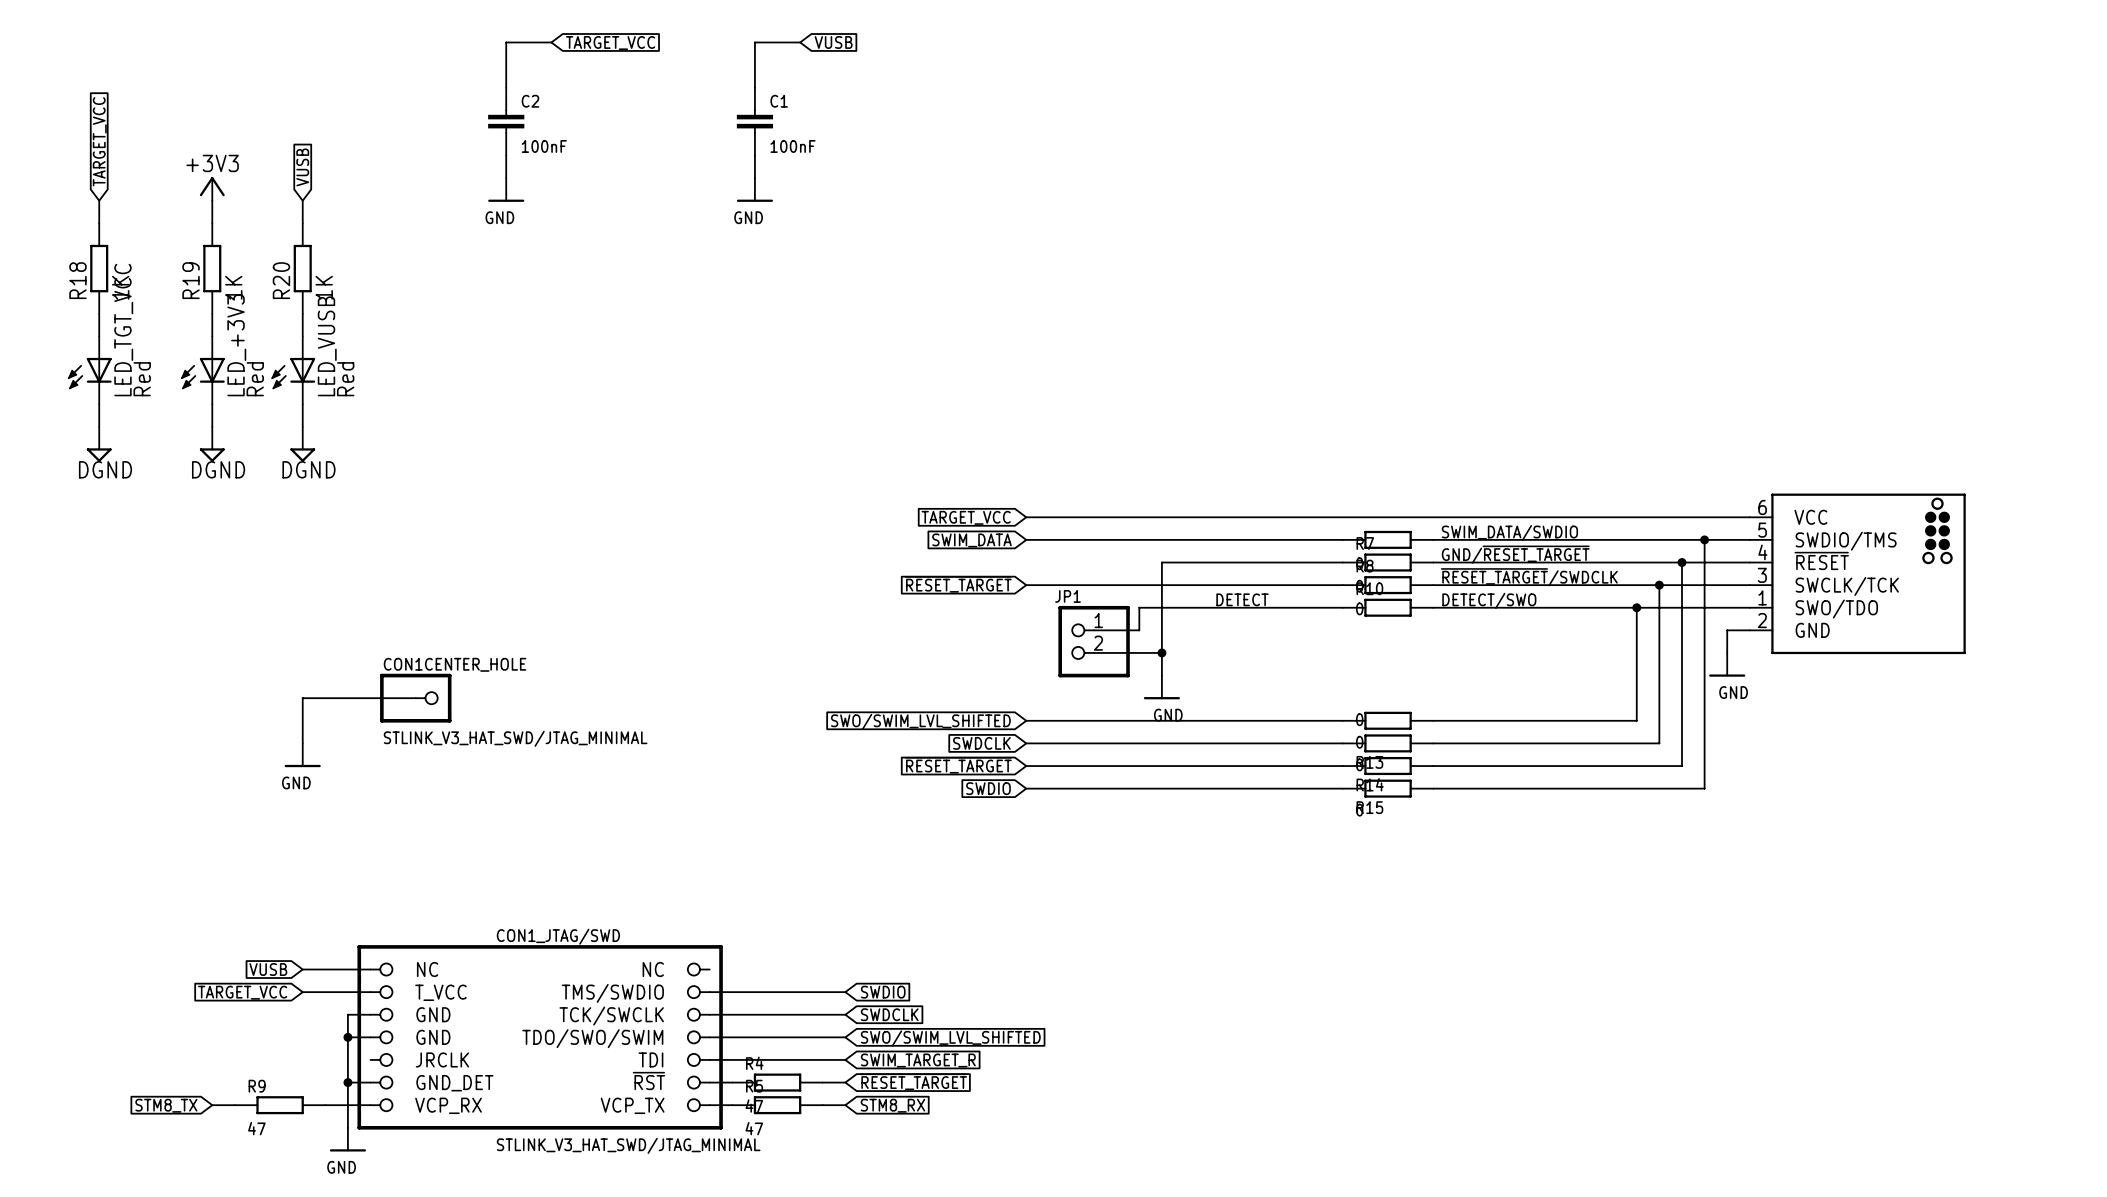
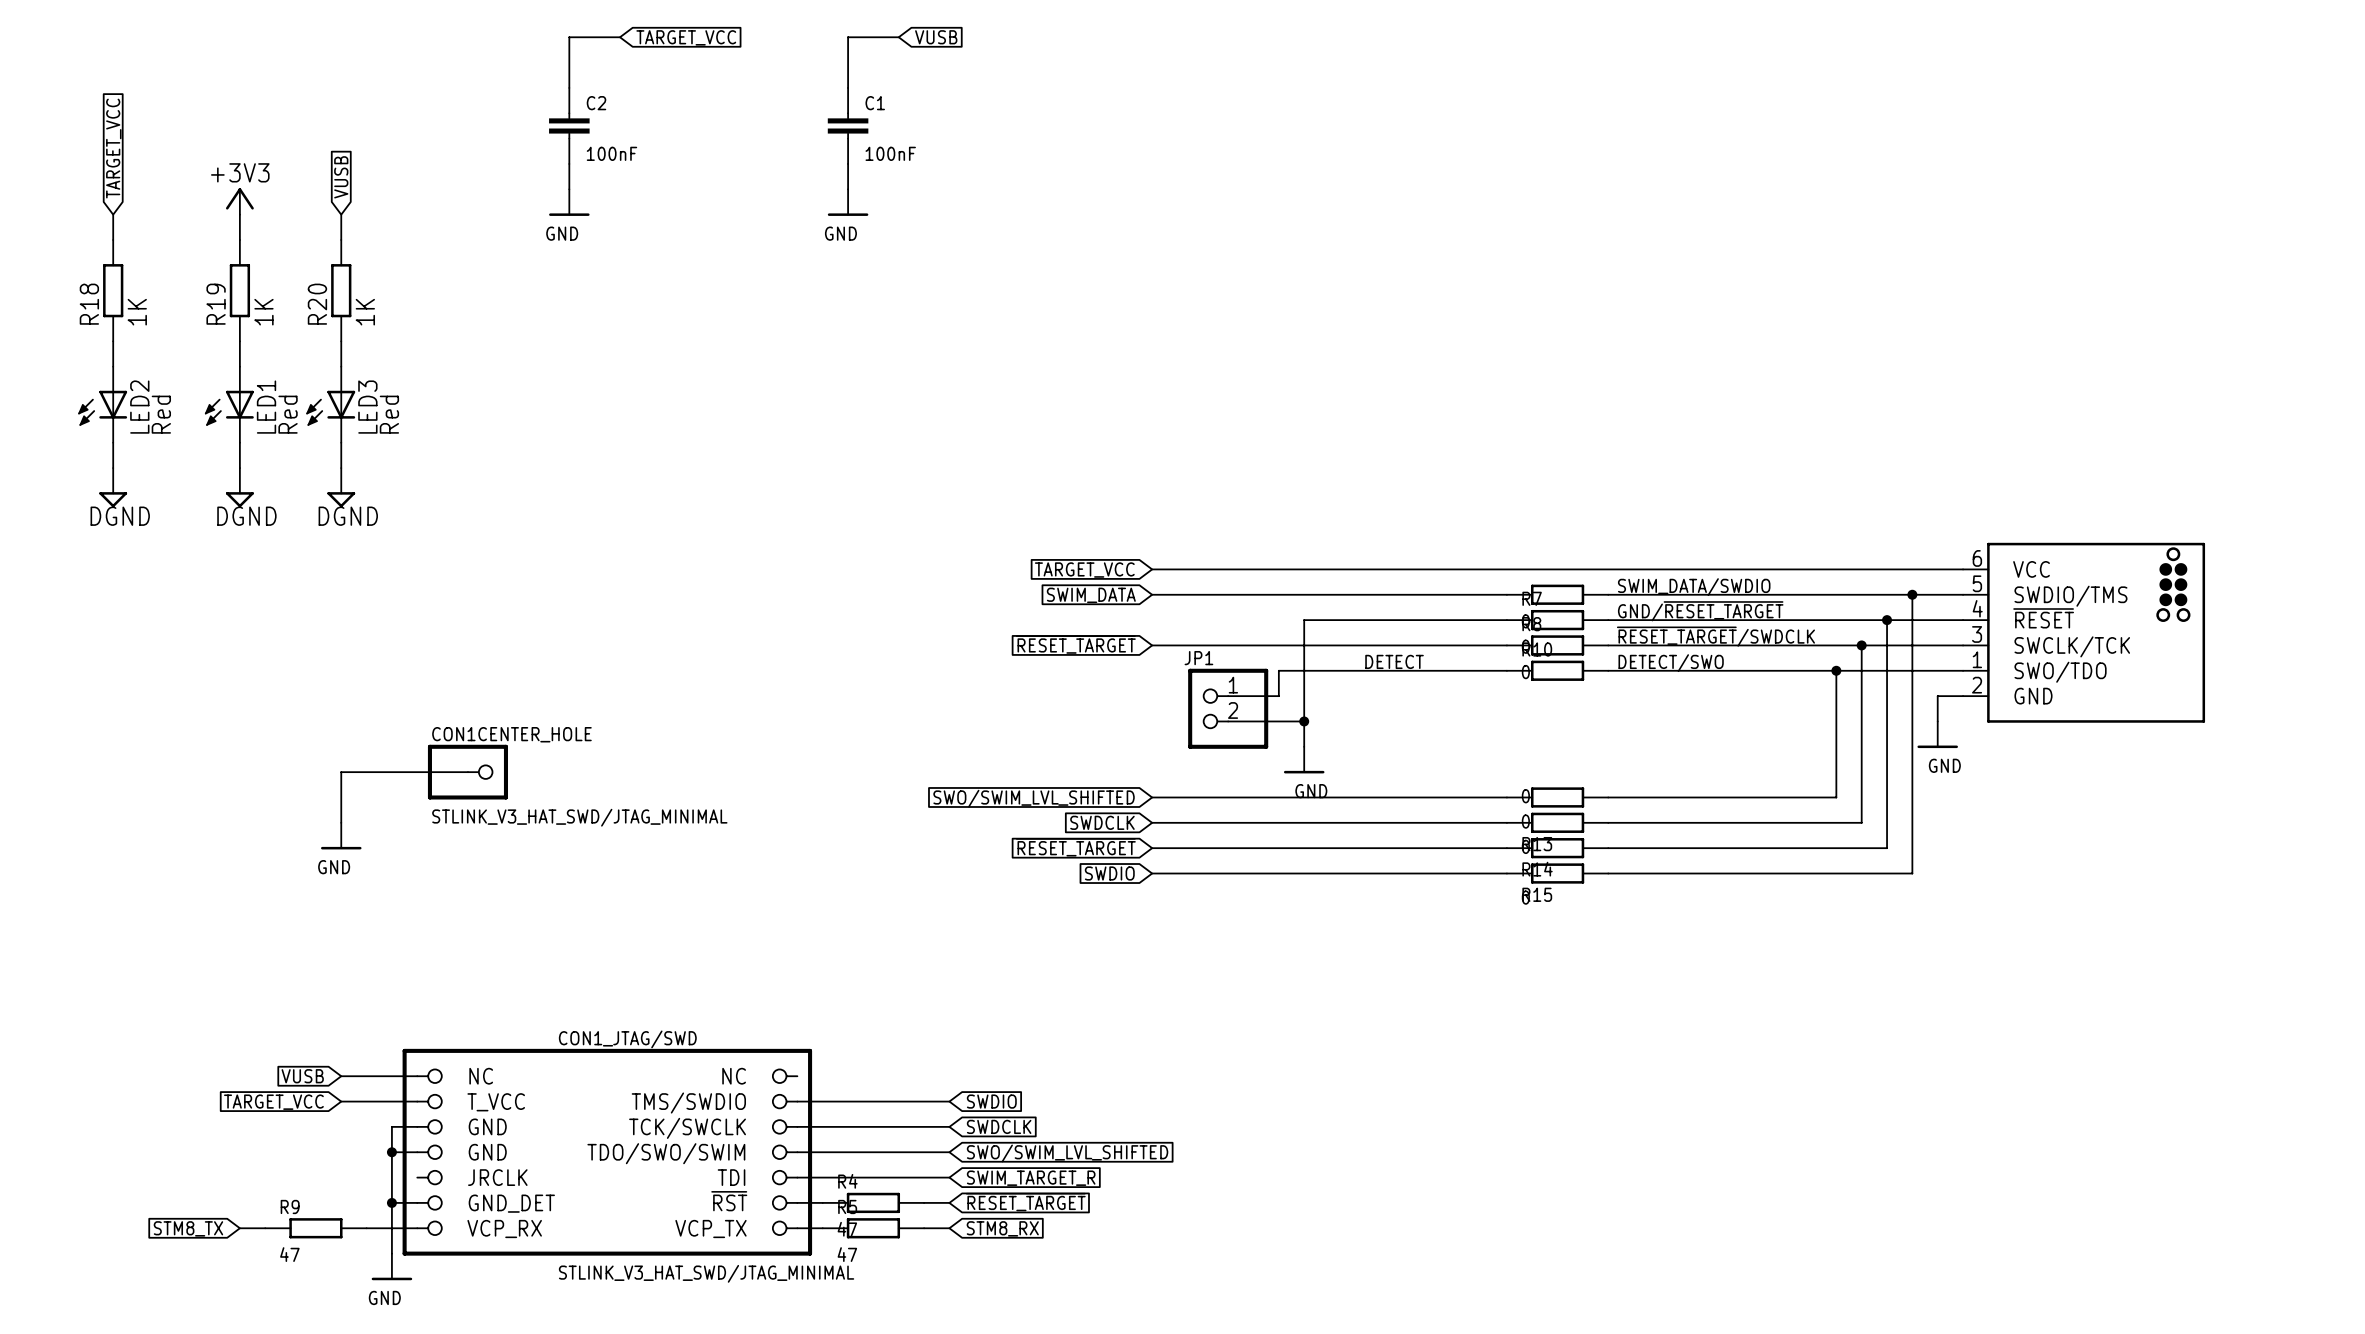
LED_TGT_VCC name: LED_TGT_VCC (123, 330) -> LED2 (139, 407)
LED_+3V3 name: LED_+3V3 (236, 345) -> LED1 (266, 407)
LED_VUSB name: LED_VUSB (327, 346) -> LED3 (367, 407)

